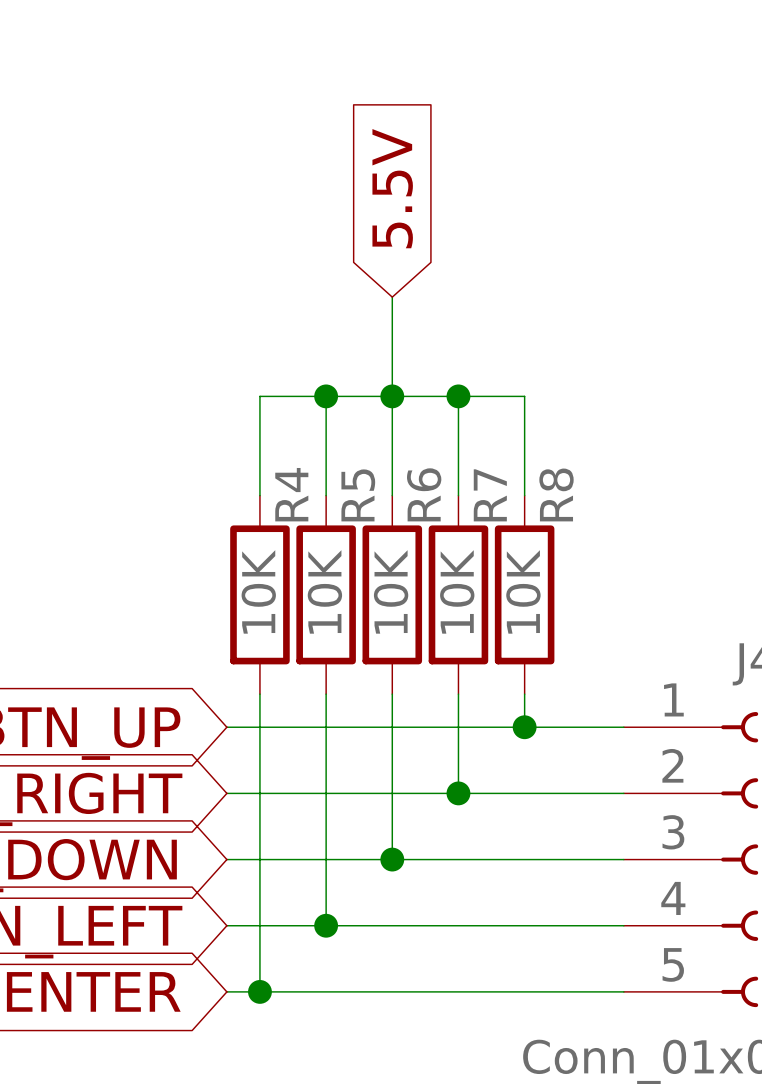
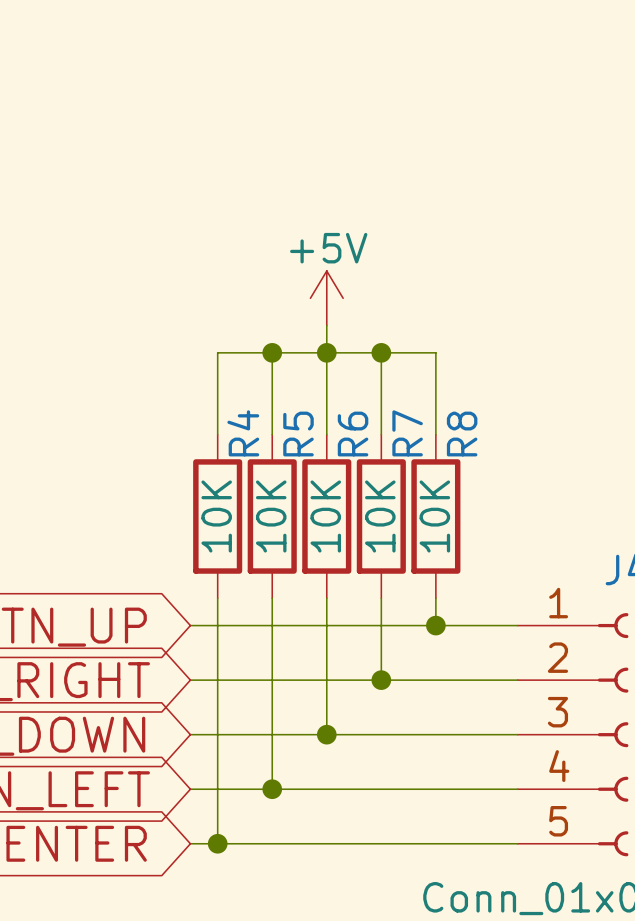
global label: 5.5V (392, 188) -> none
power symbol: none -> +5V (326, 298)

